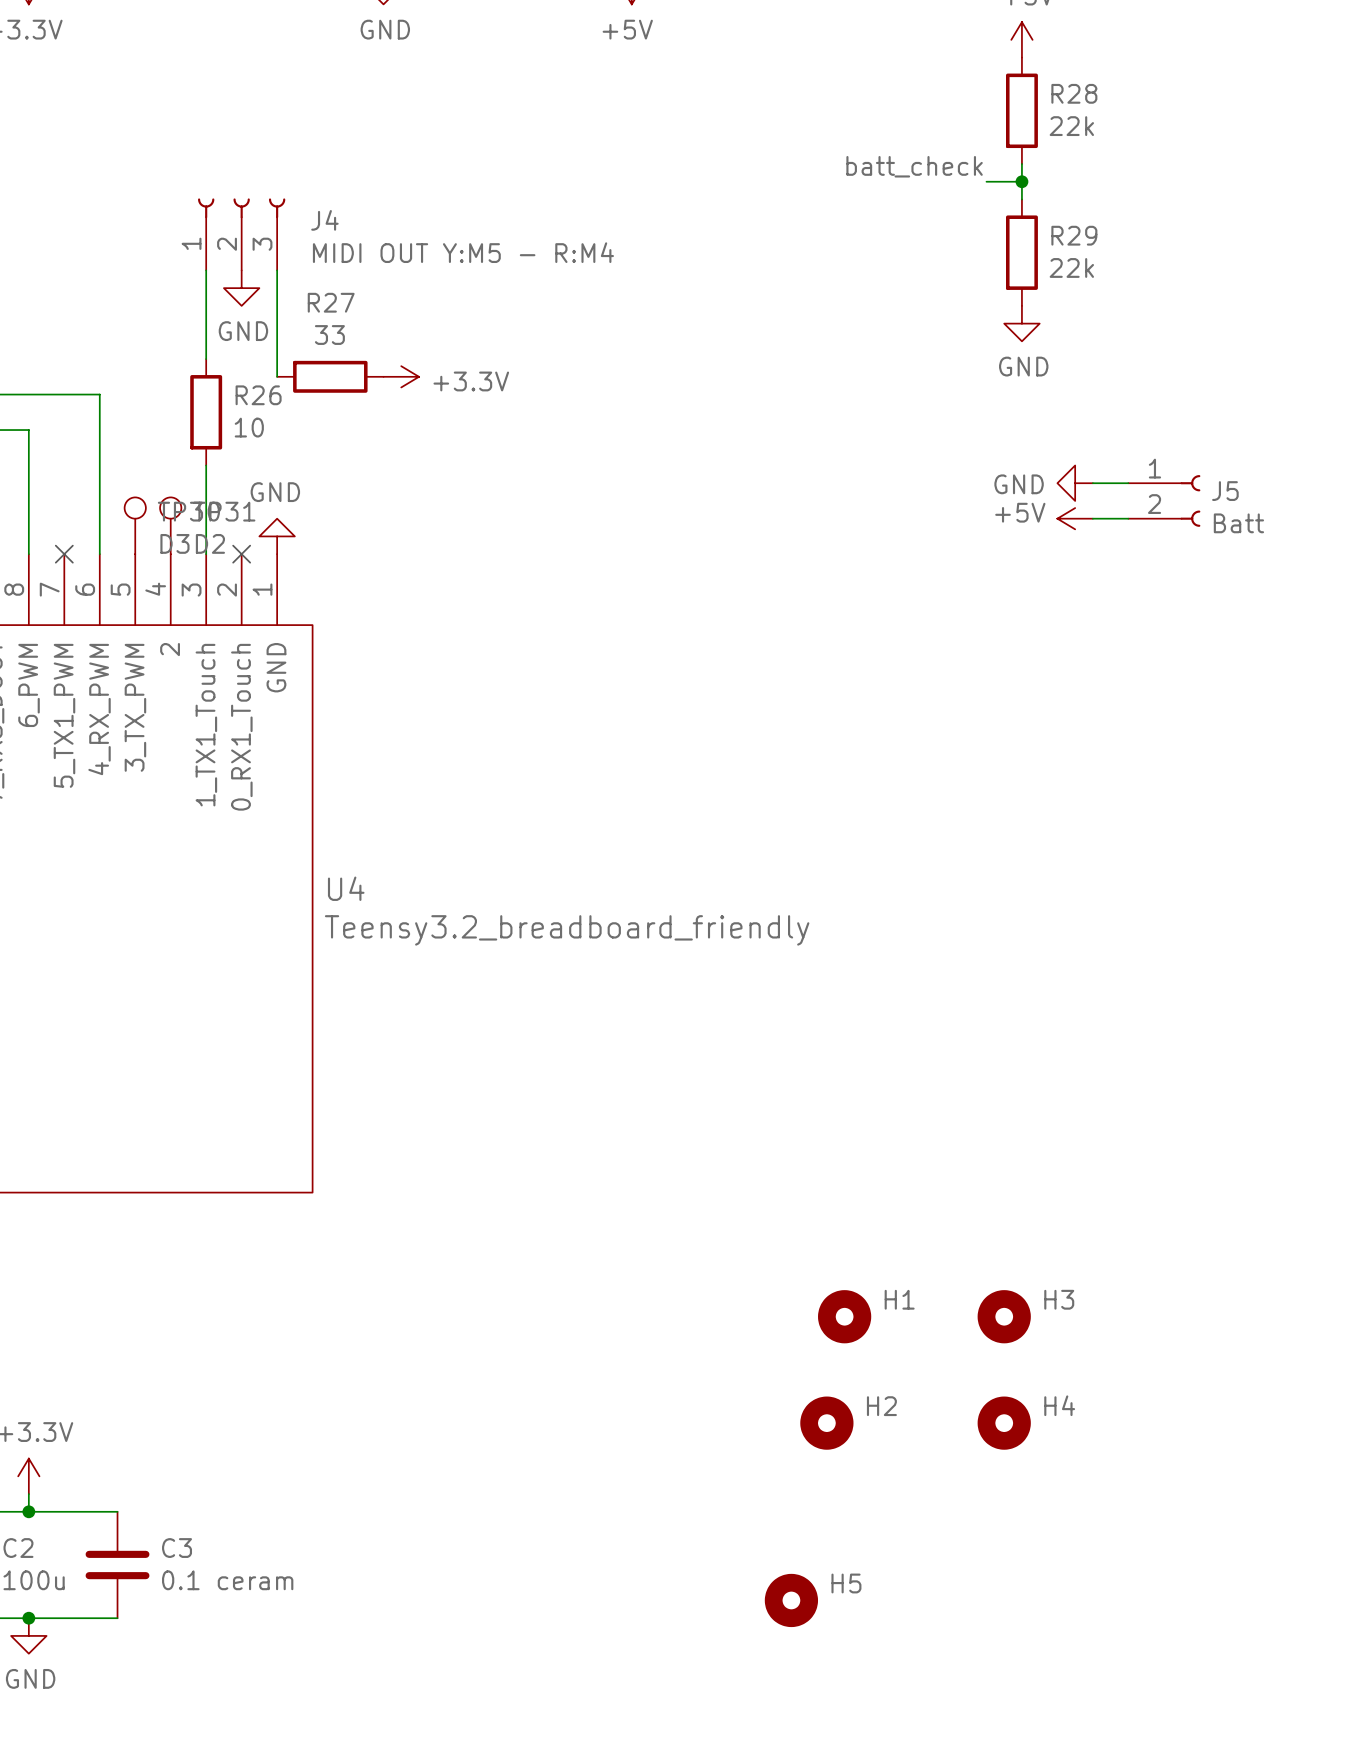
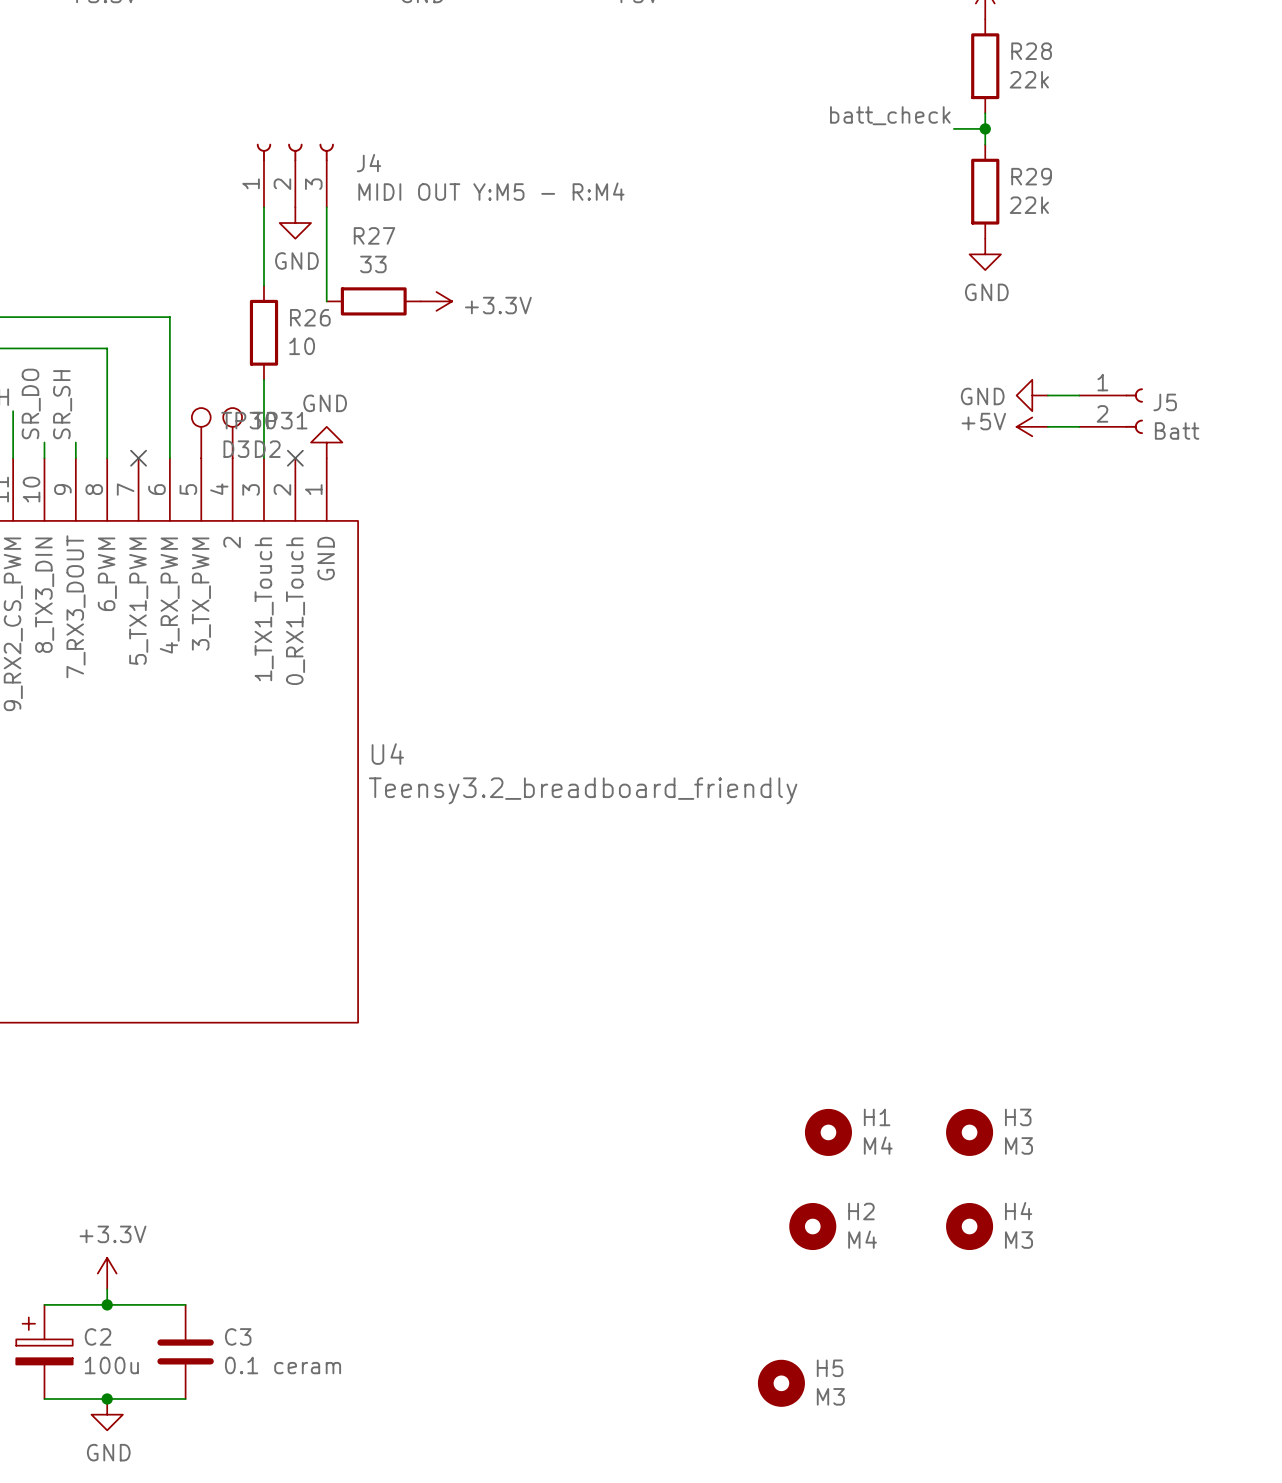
H1 value: none -> M4 (878, 1145)
H3 value: none -> M3 (1018, 1145)
H2 value: none -> M4 (862, 1239)
H4 value: none -> M3 (1018, 1240)
H5 value: none -> M3 (830, 1396)

